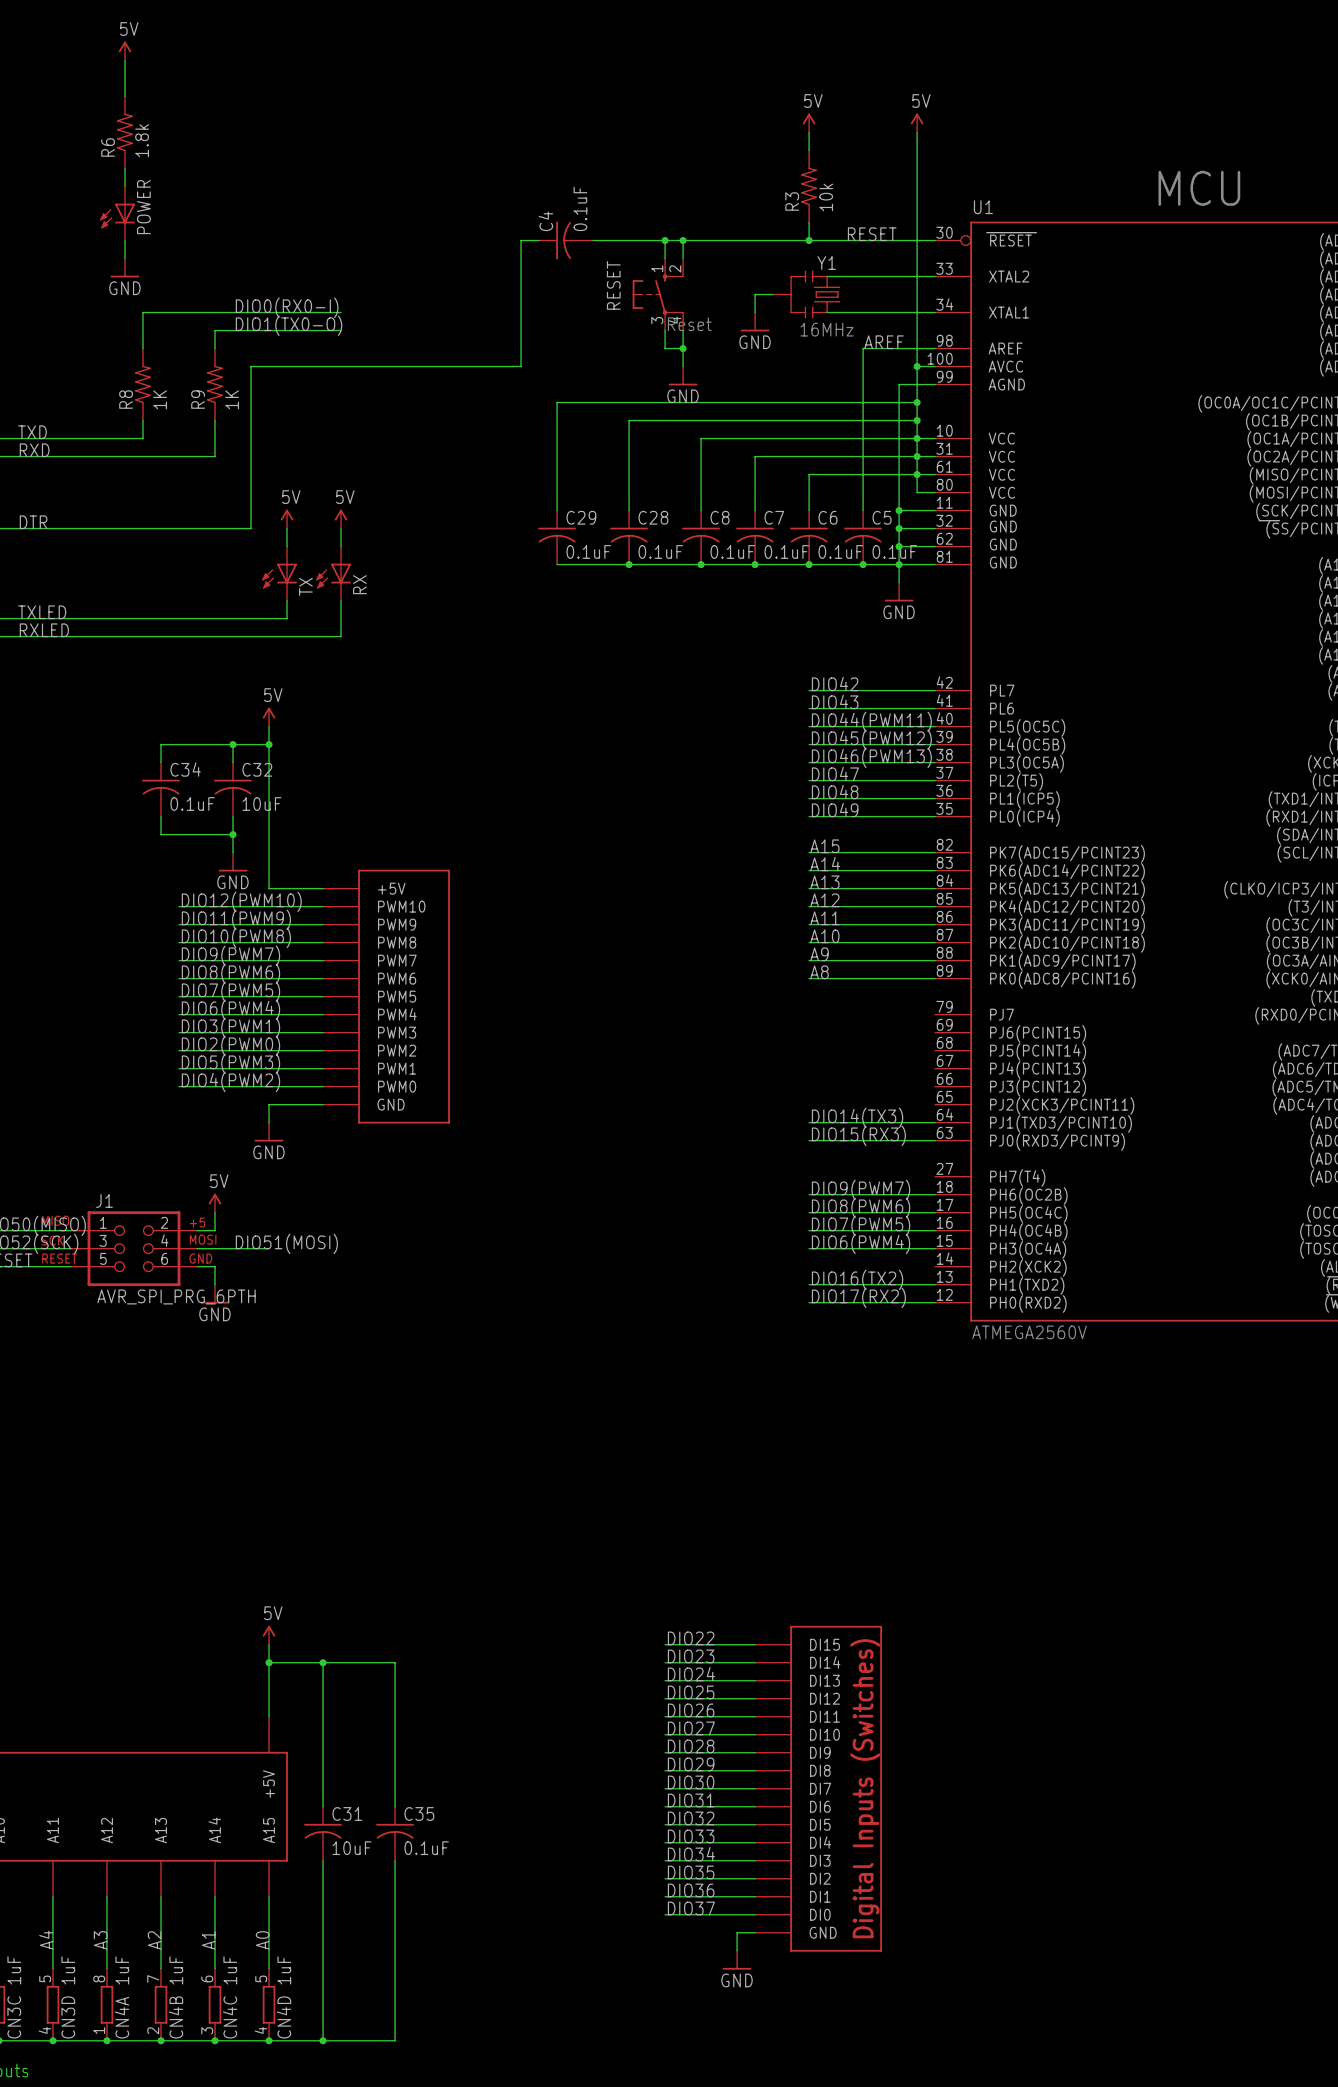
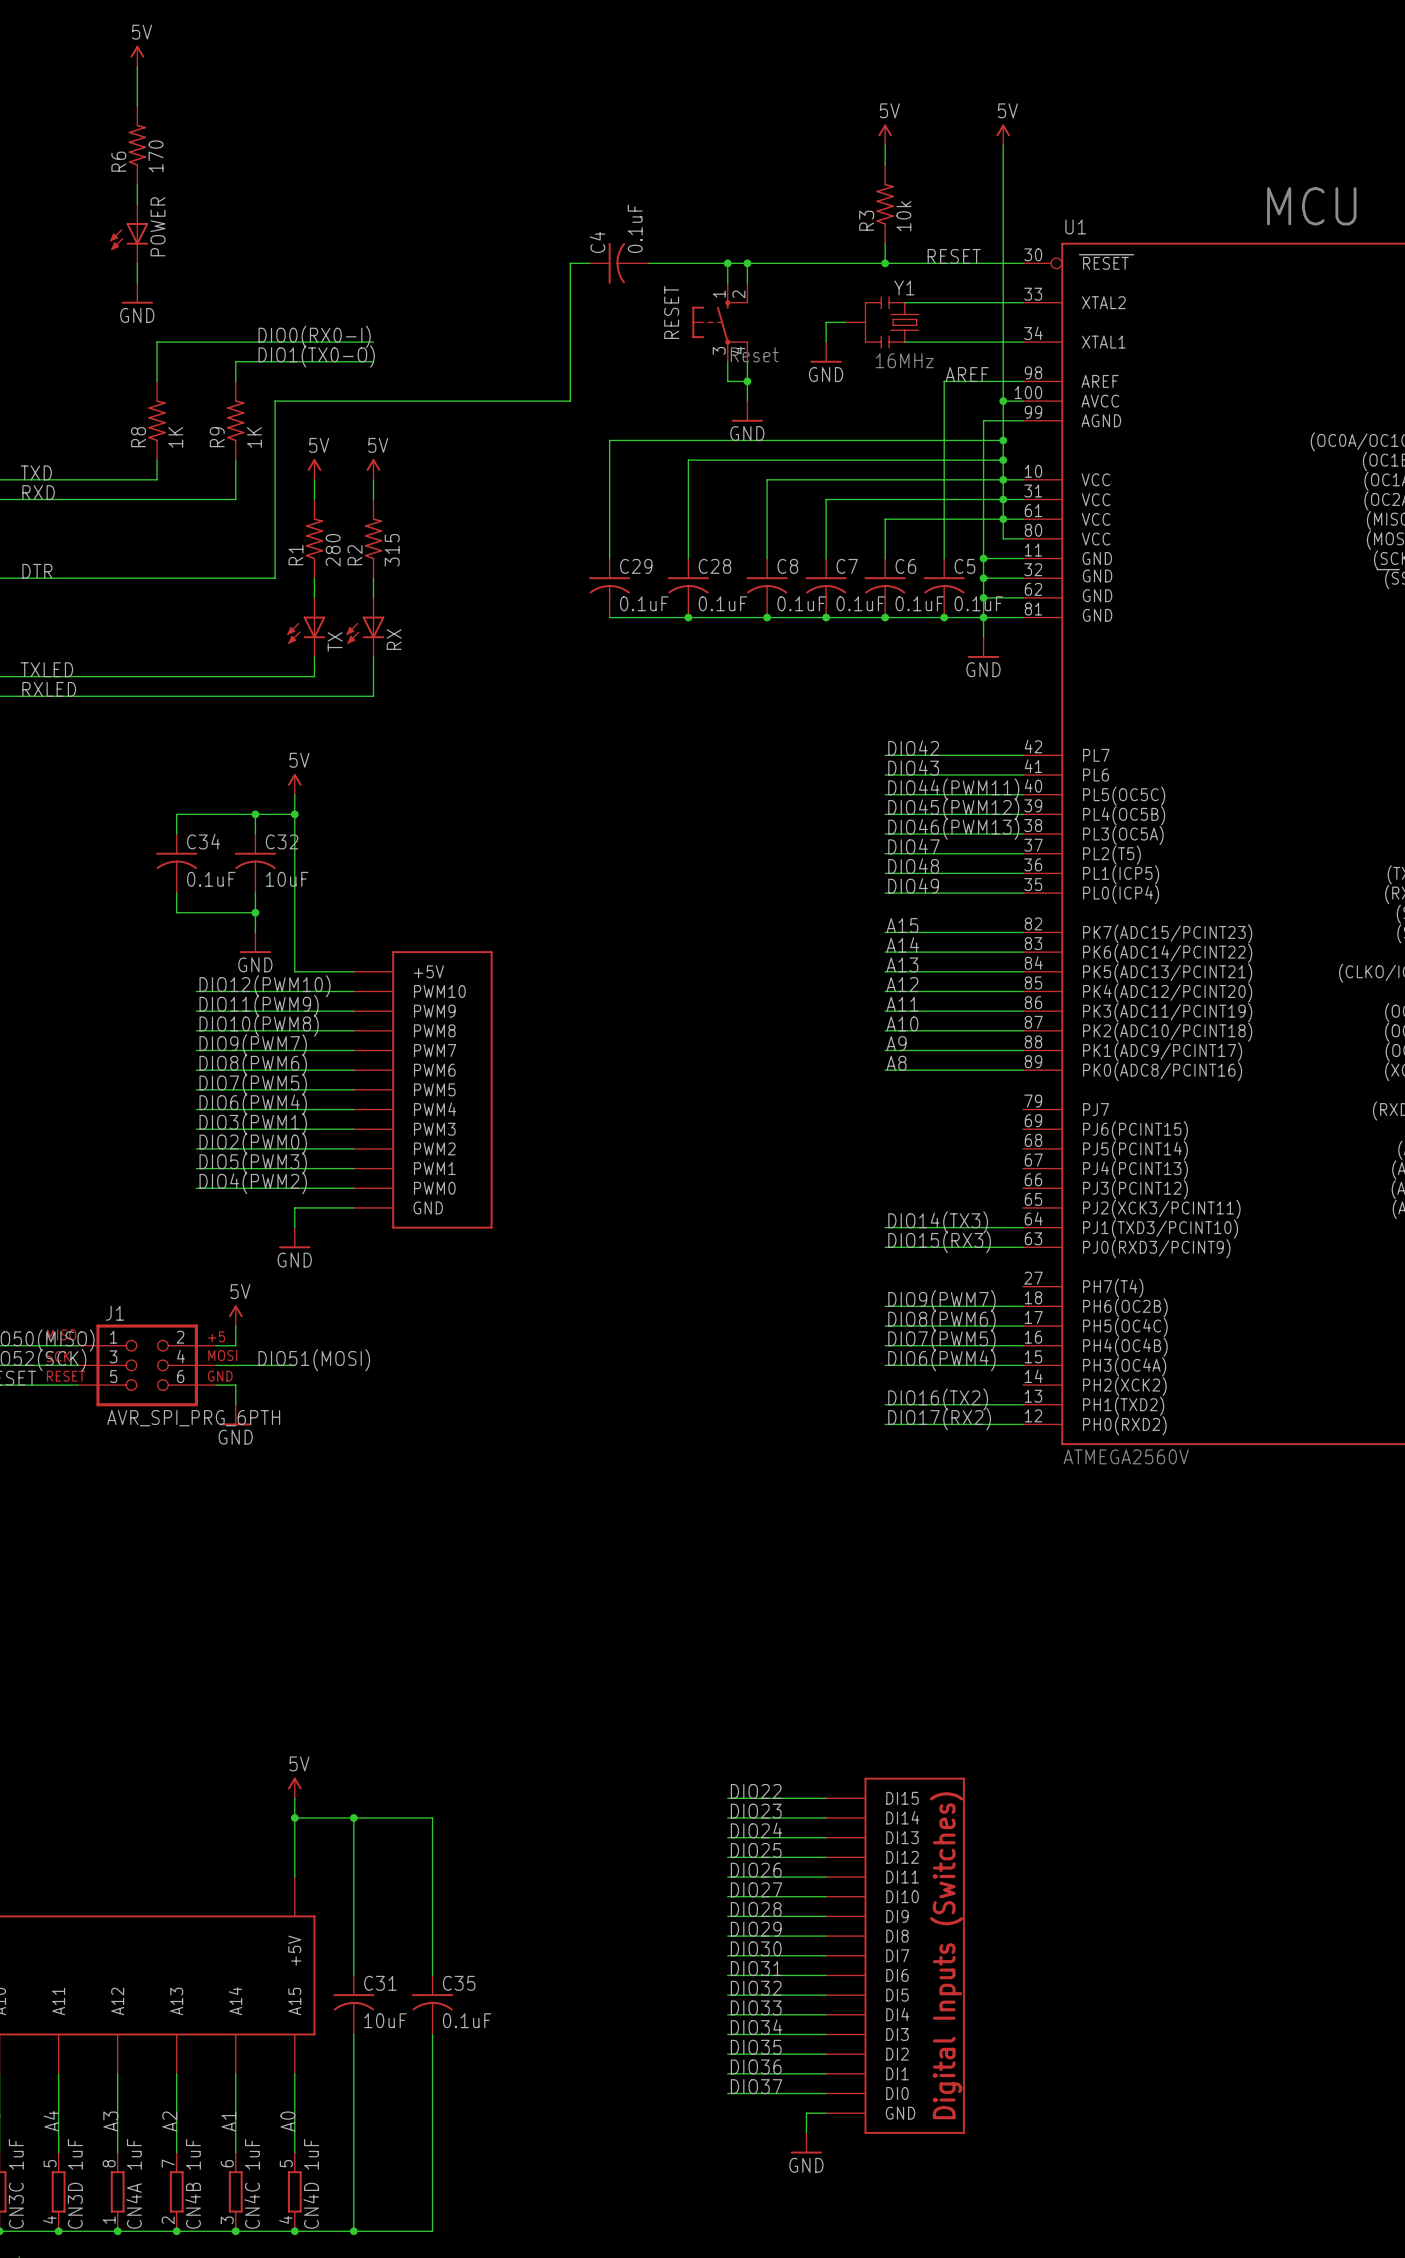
R6 value: 1.8k (142, 140) -> 170 (156, 156)
power symbol: none -> 5V (314, 469)
power symbol: none -> 5V (373, 469)
wire: none -> (314, 479) (314, 499)
wire: none -> (373, 479) (373, 499)
R1: none -> 280 (314, 538)
R2: none -> 315 (373, 538)
power symbol: 5V (287, 519) -> none
power symbol: 5V (341, 519) -> none

